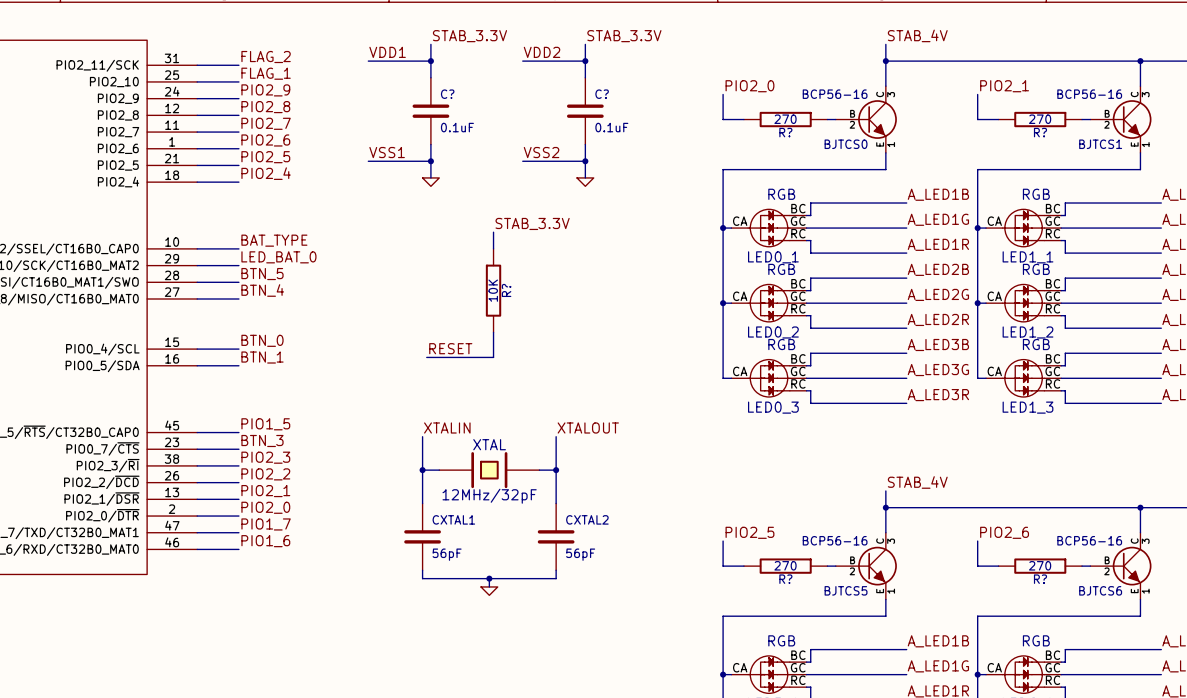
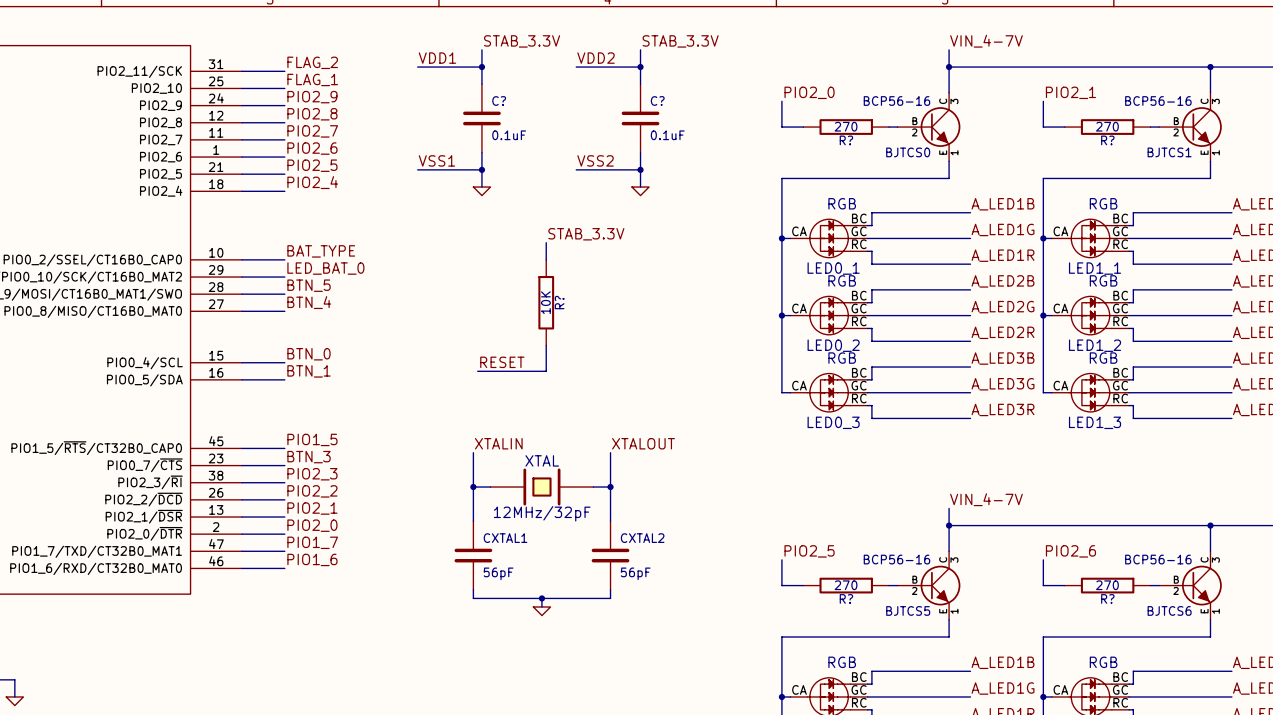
label: STAB_4V (917, 35) -> VIN_4-7V (986, 41)
label: STAB_4V (917, 482) -> VIN_4-7V (986, 499)

